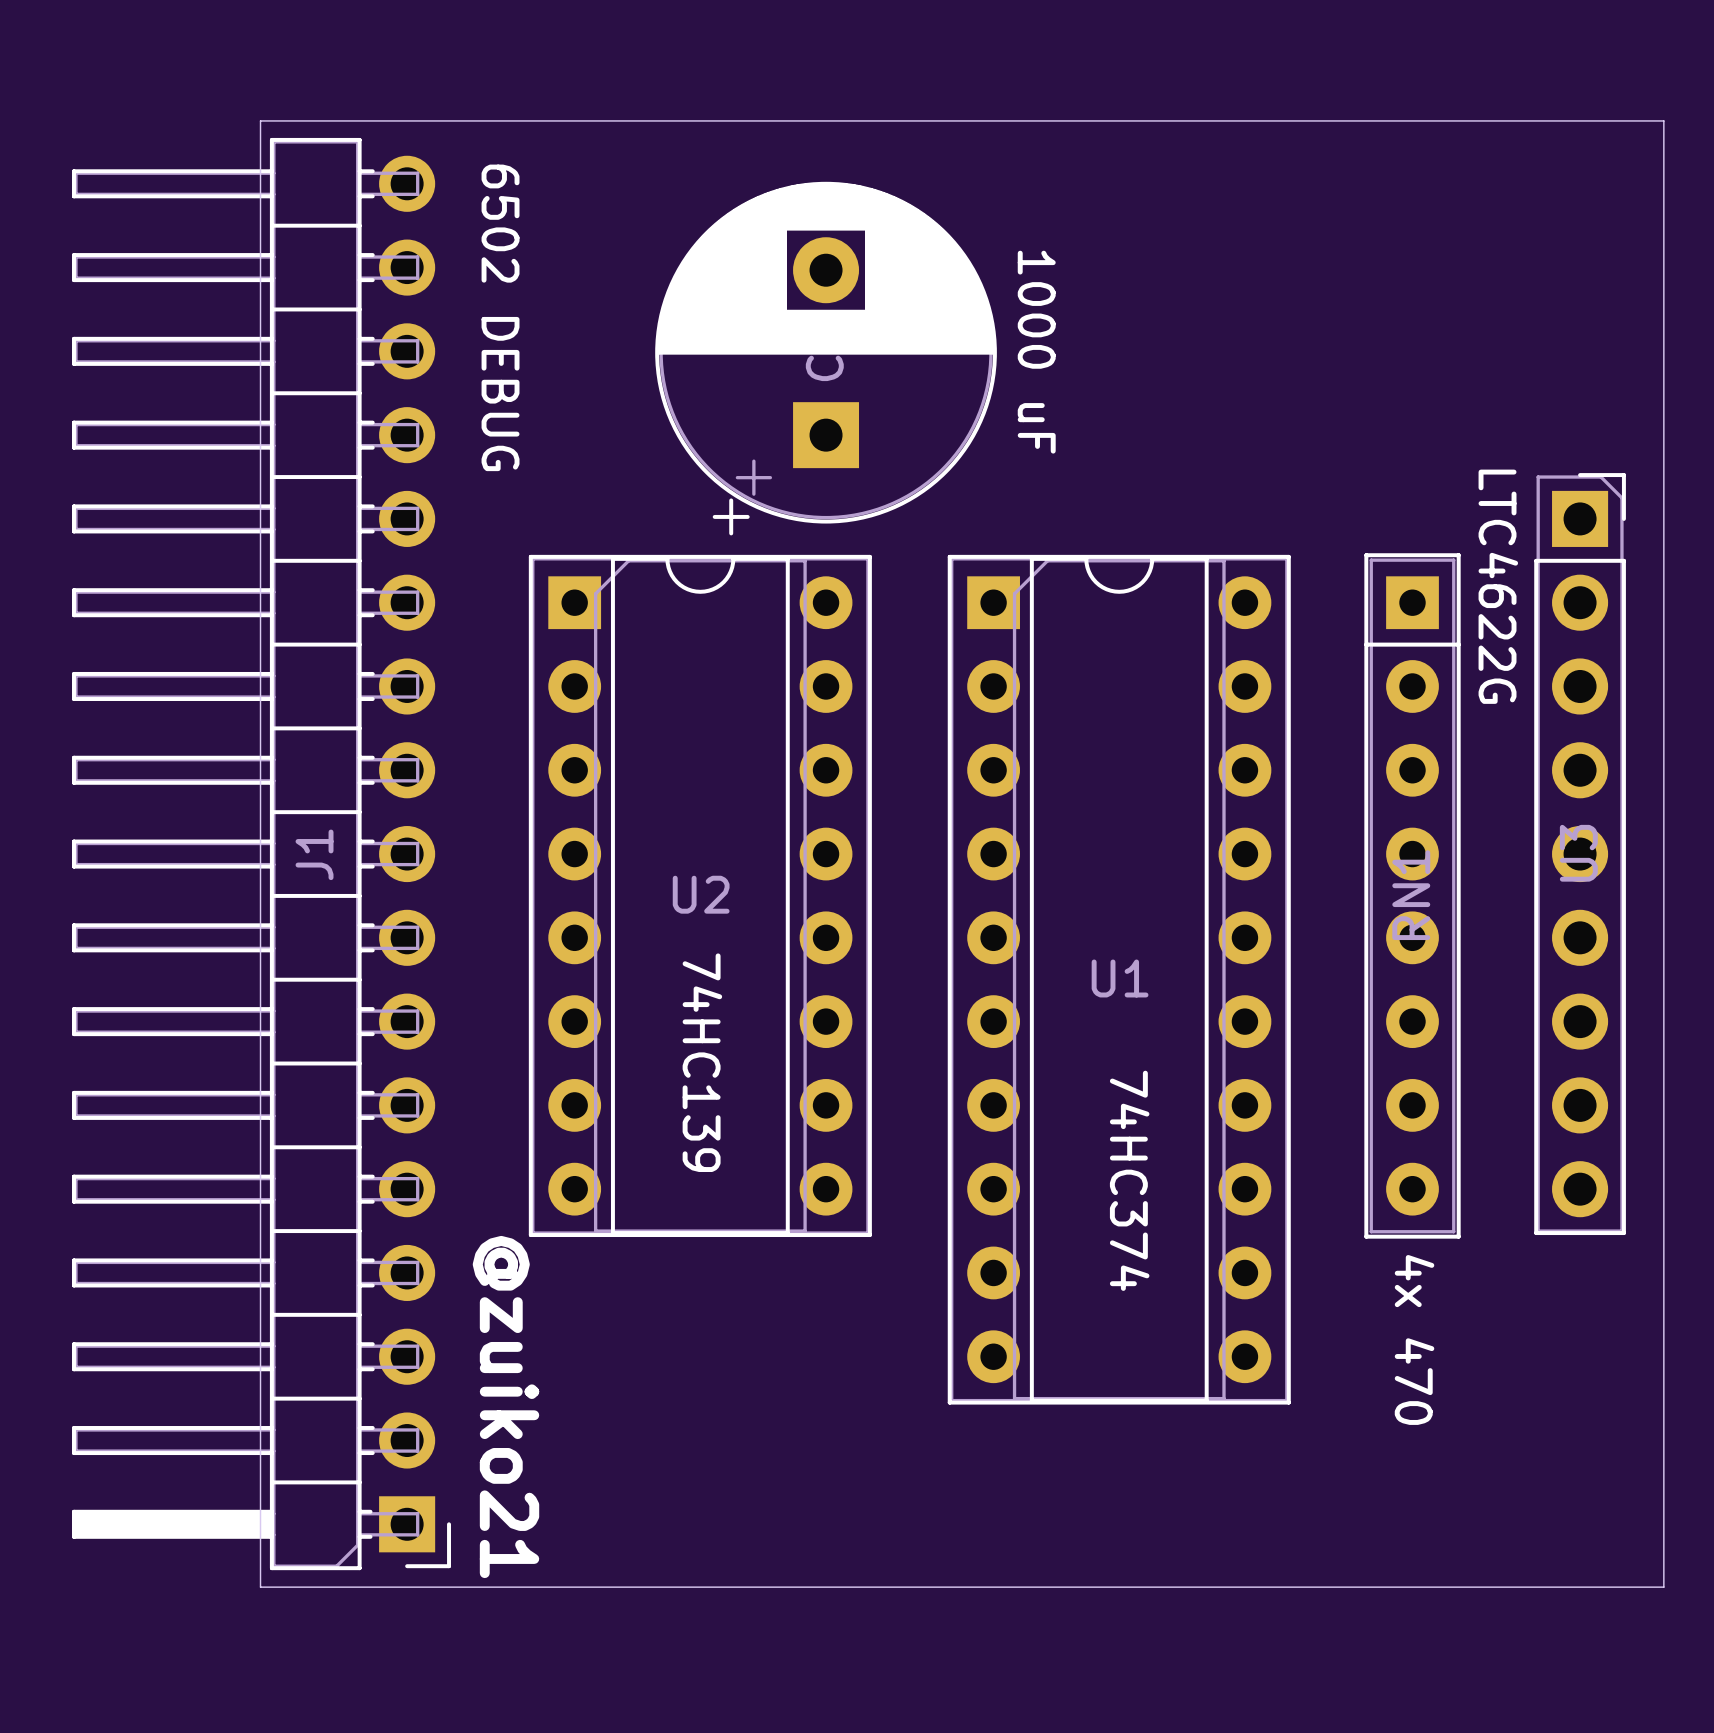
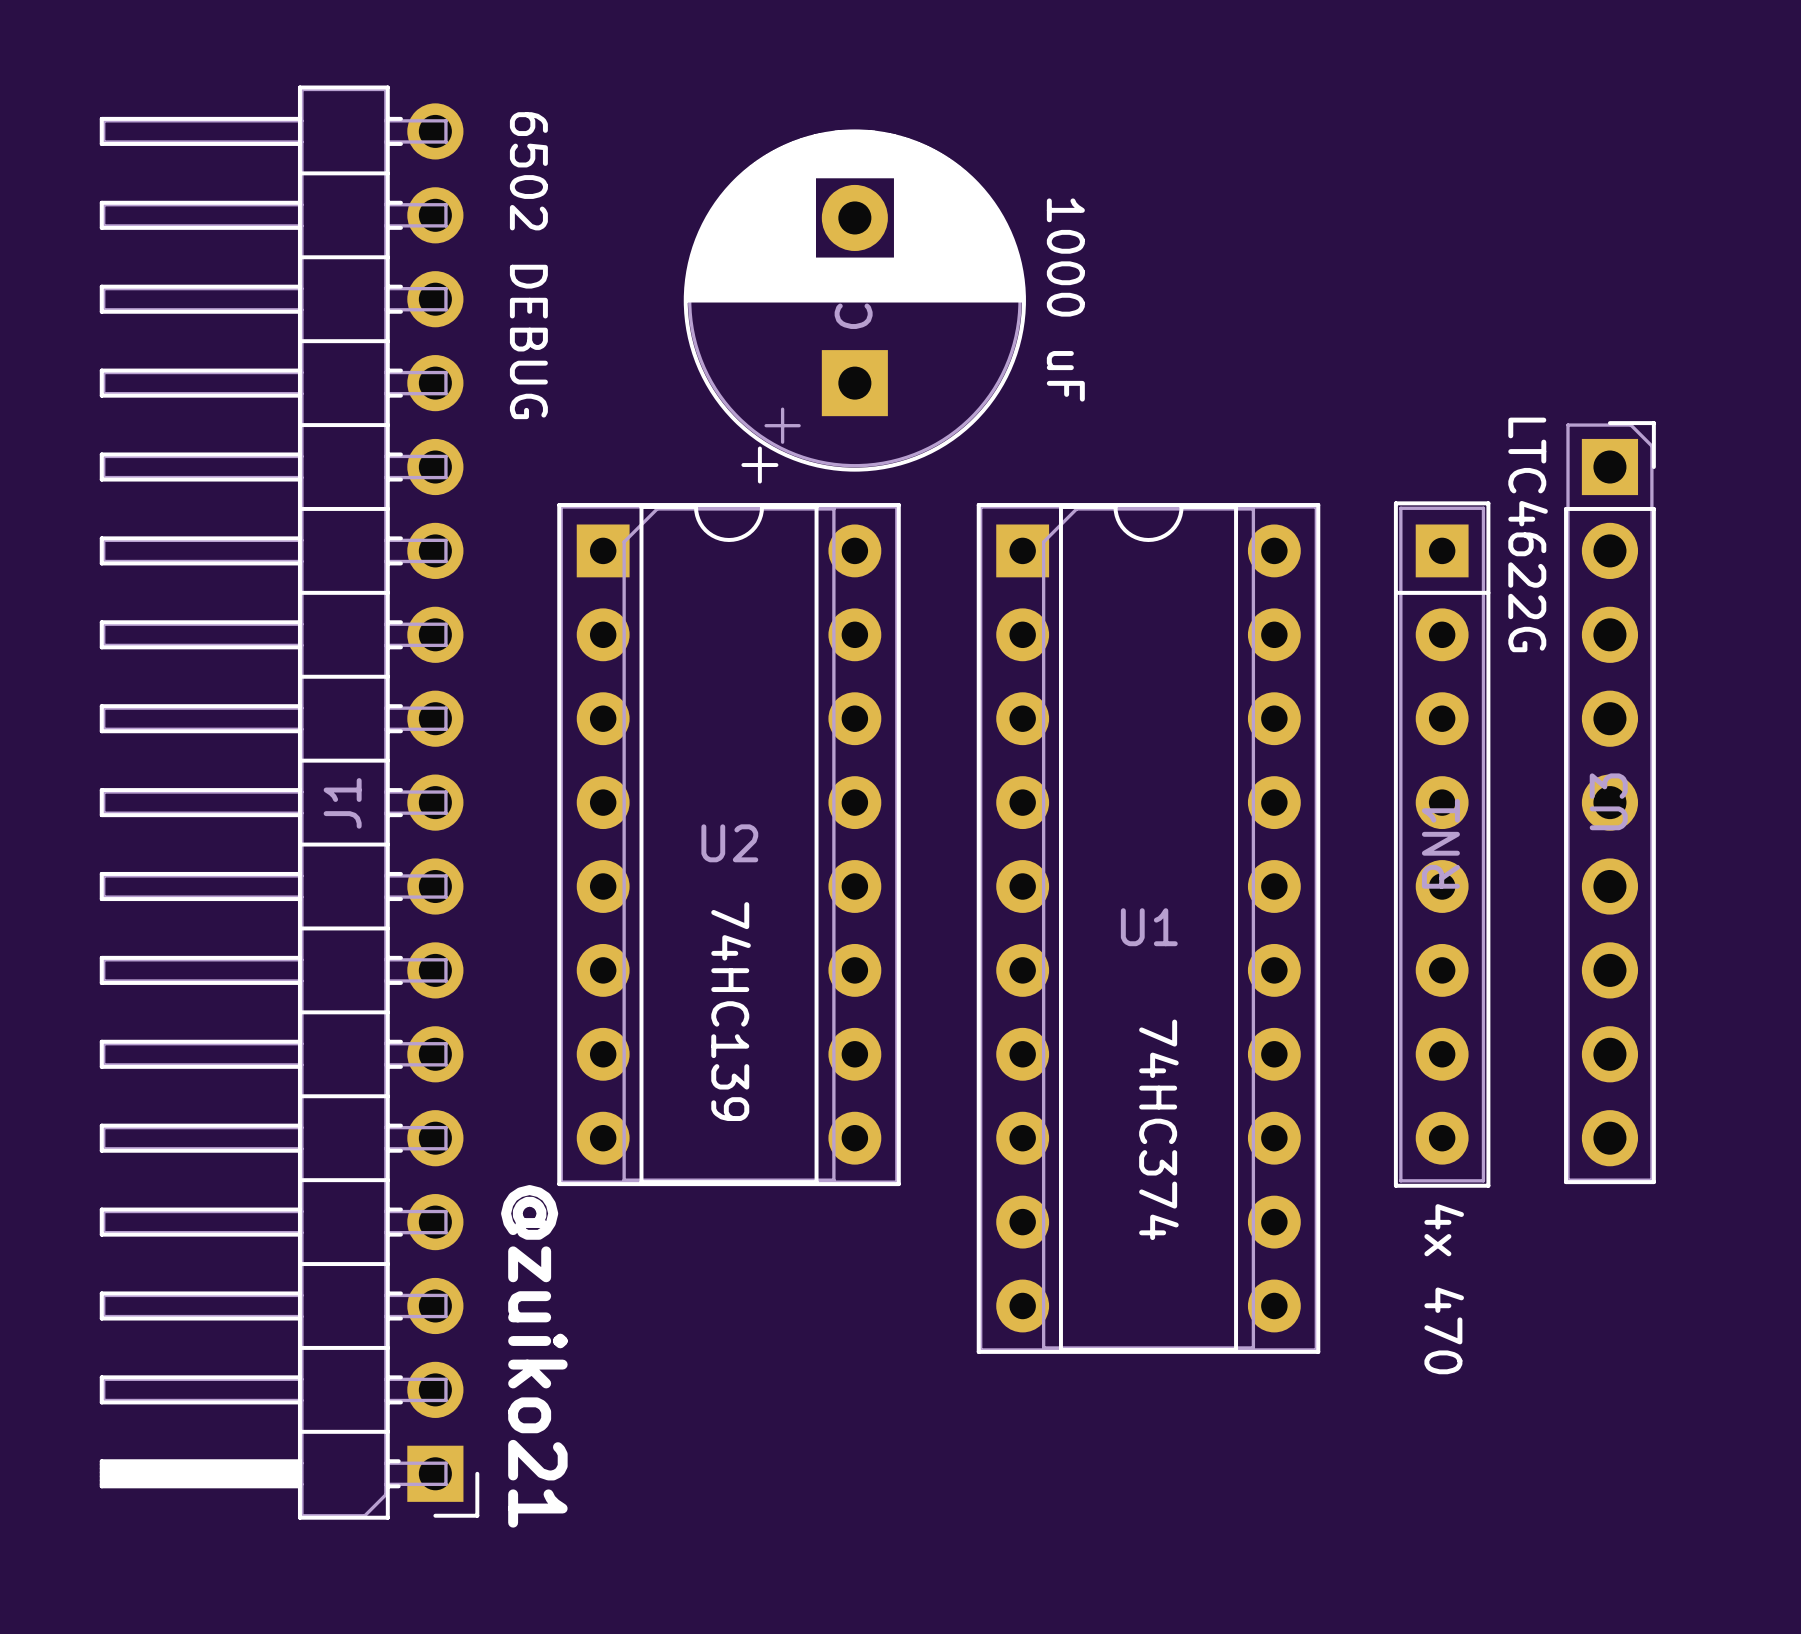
board edge: (260, 120) (260, 1587) (1663, 1587) (1663, 120) (260, 120) -> none

